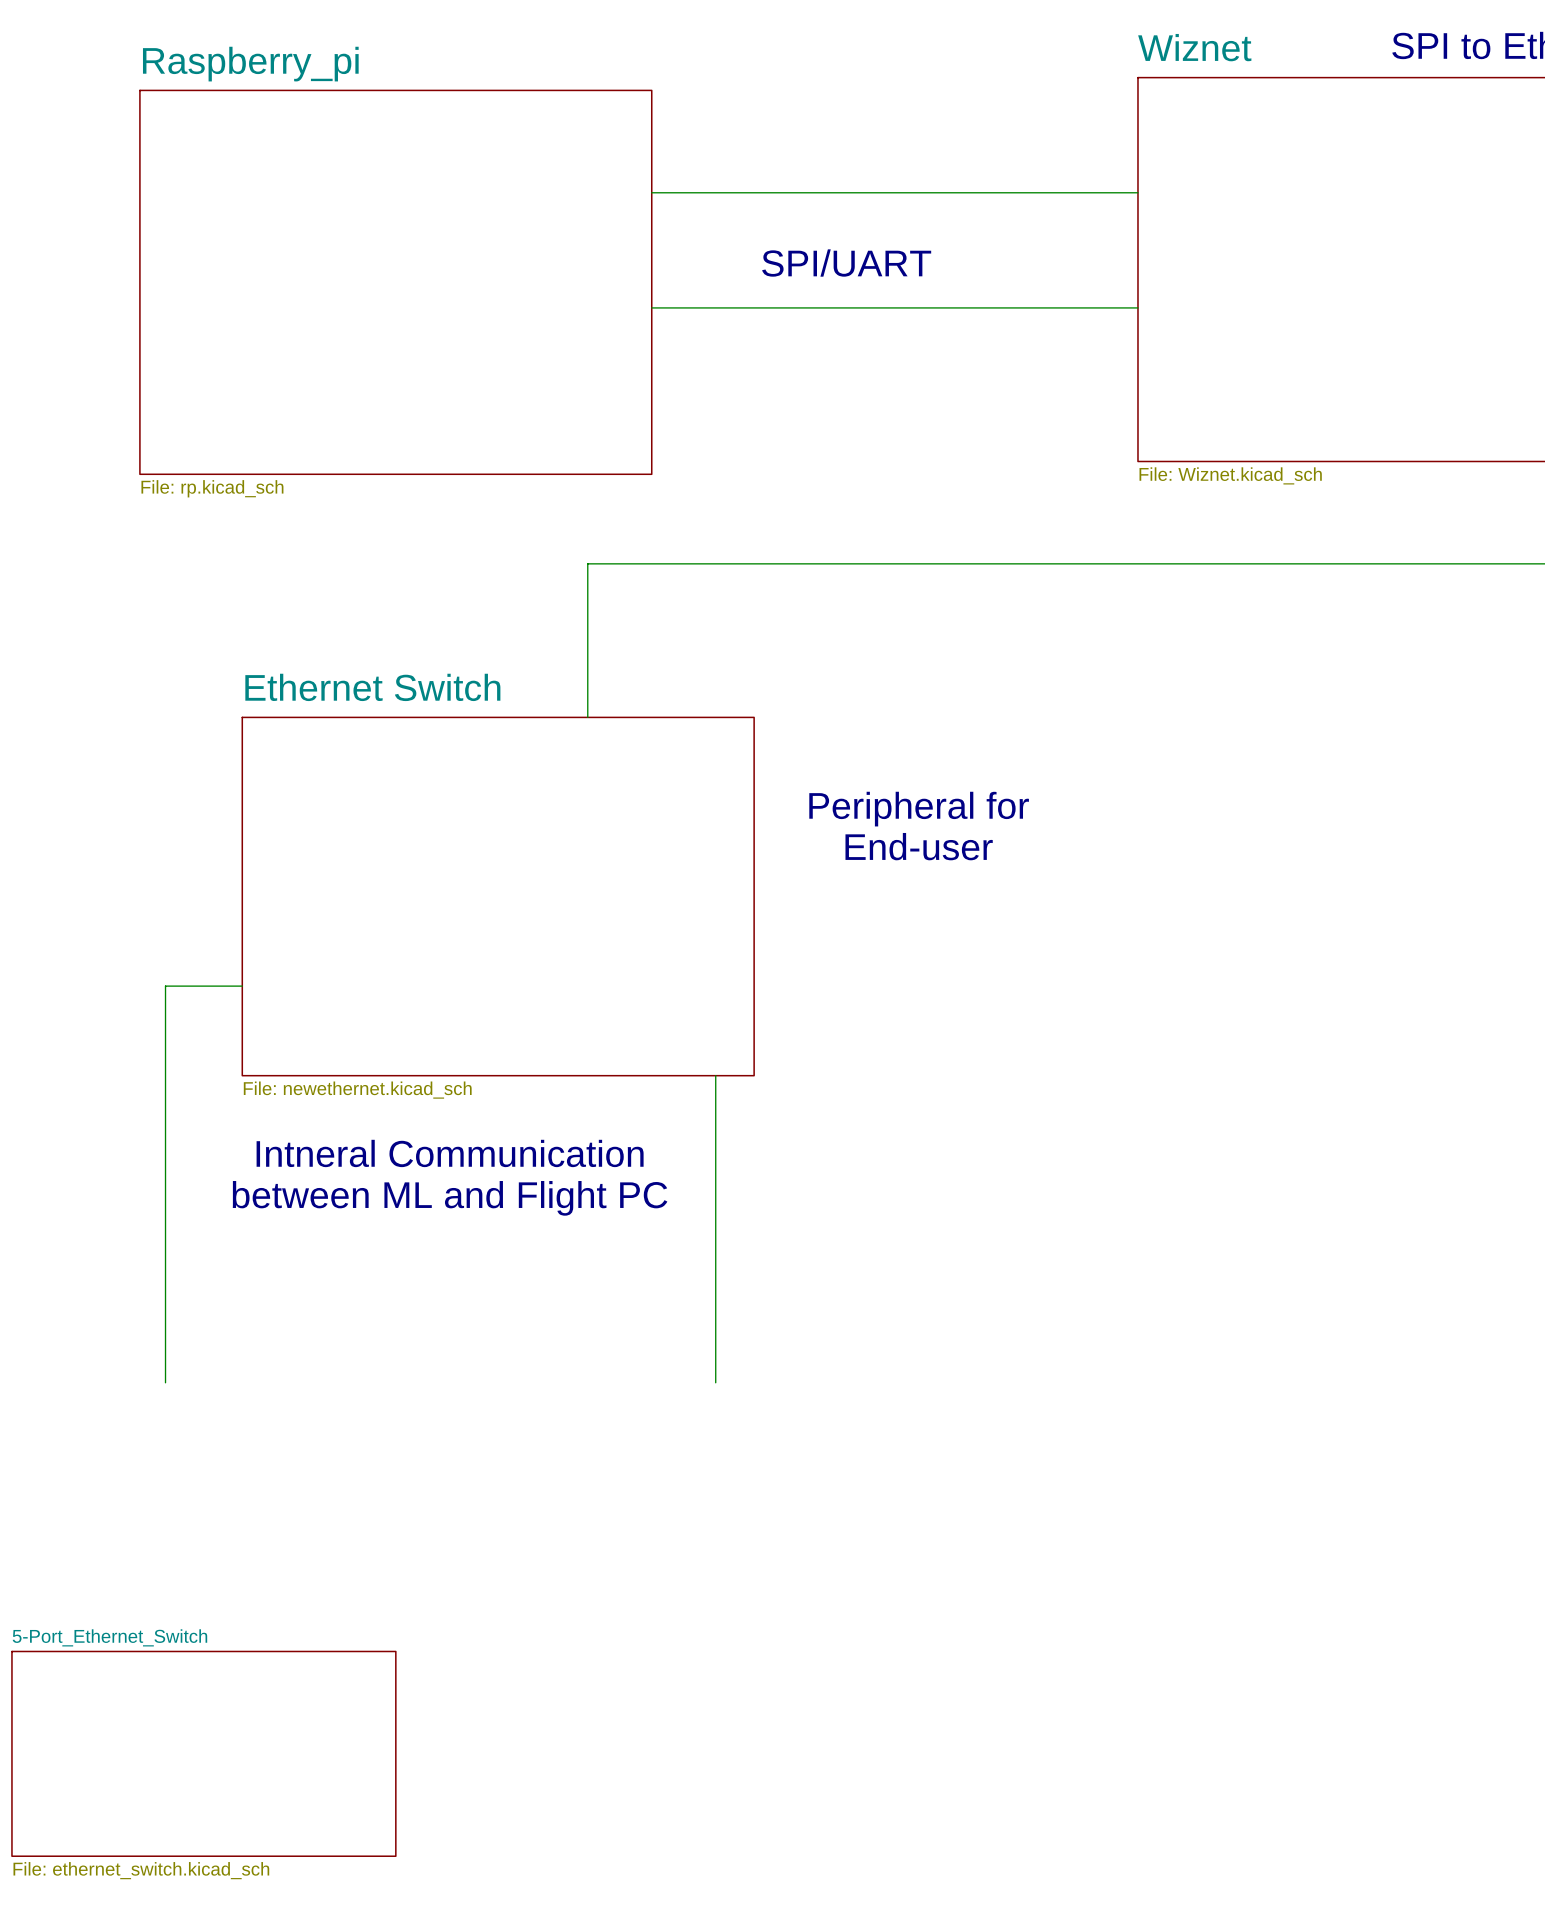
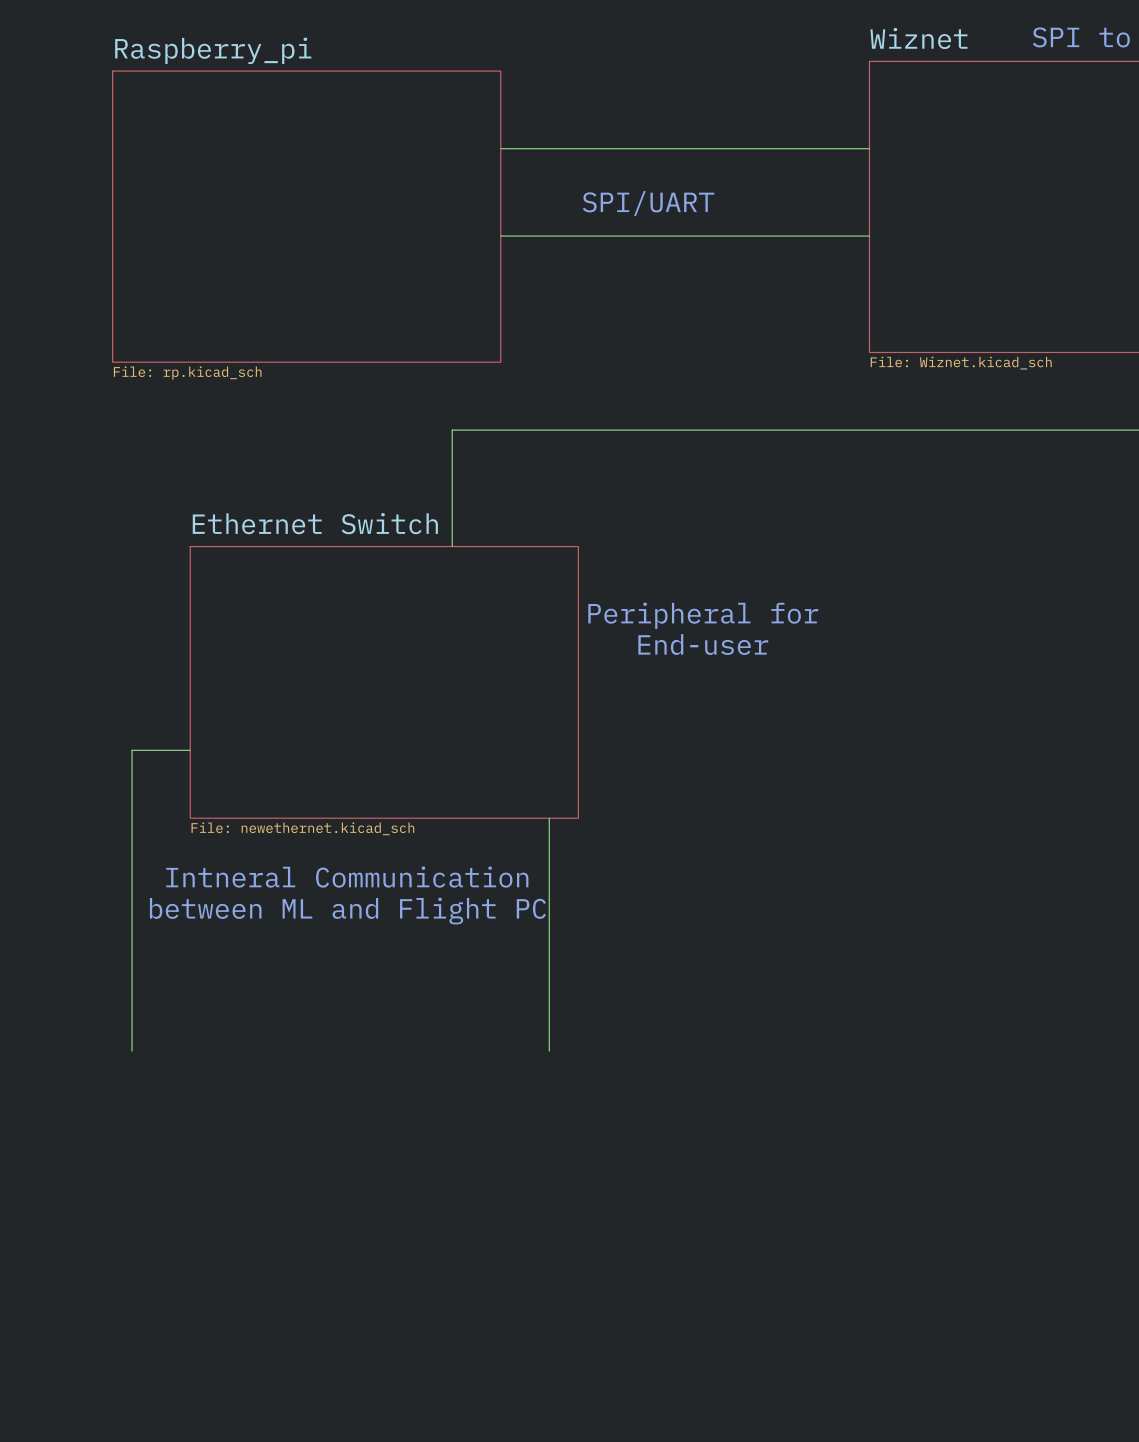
sheet 5-Port_Ethernet_Switch: File: ethernet_switch.kicad_sch (203, 1753) -> none

